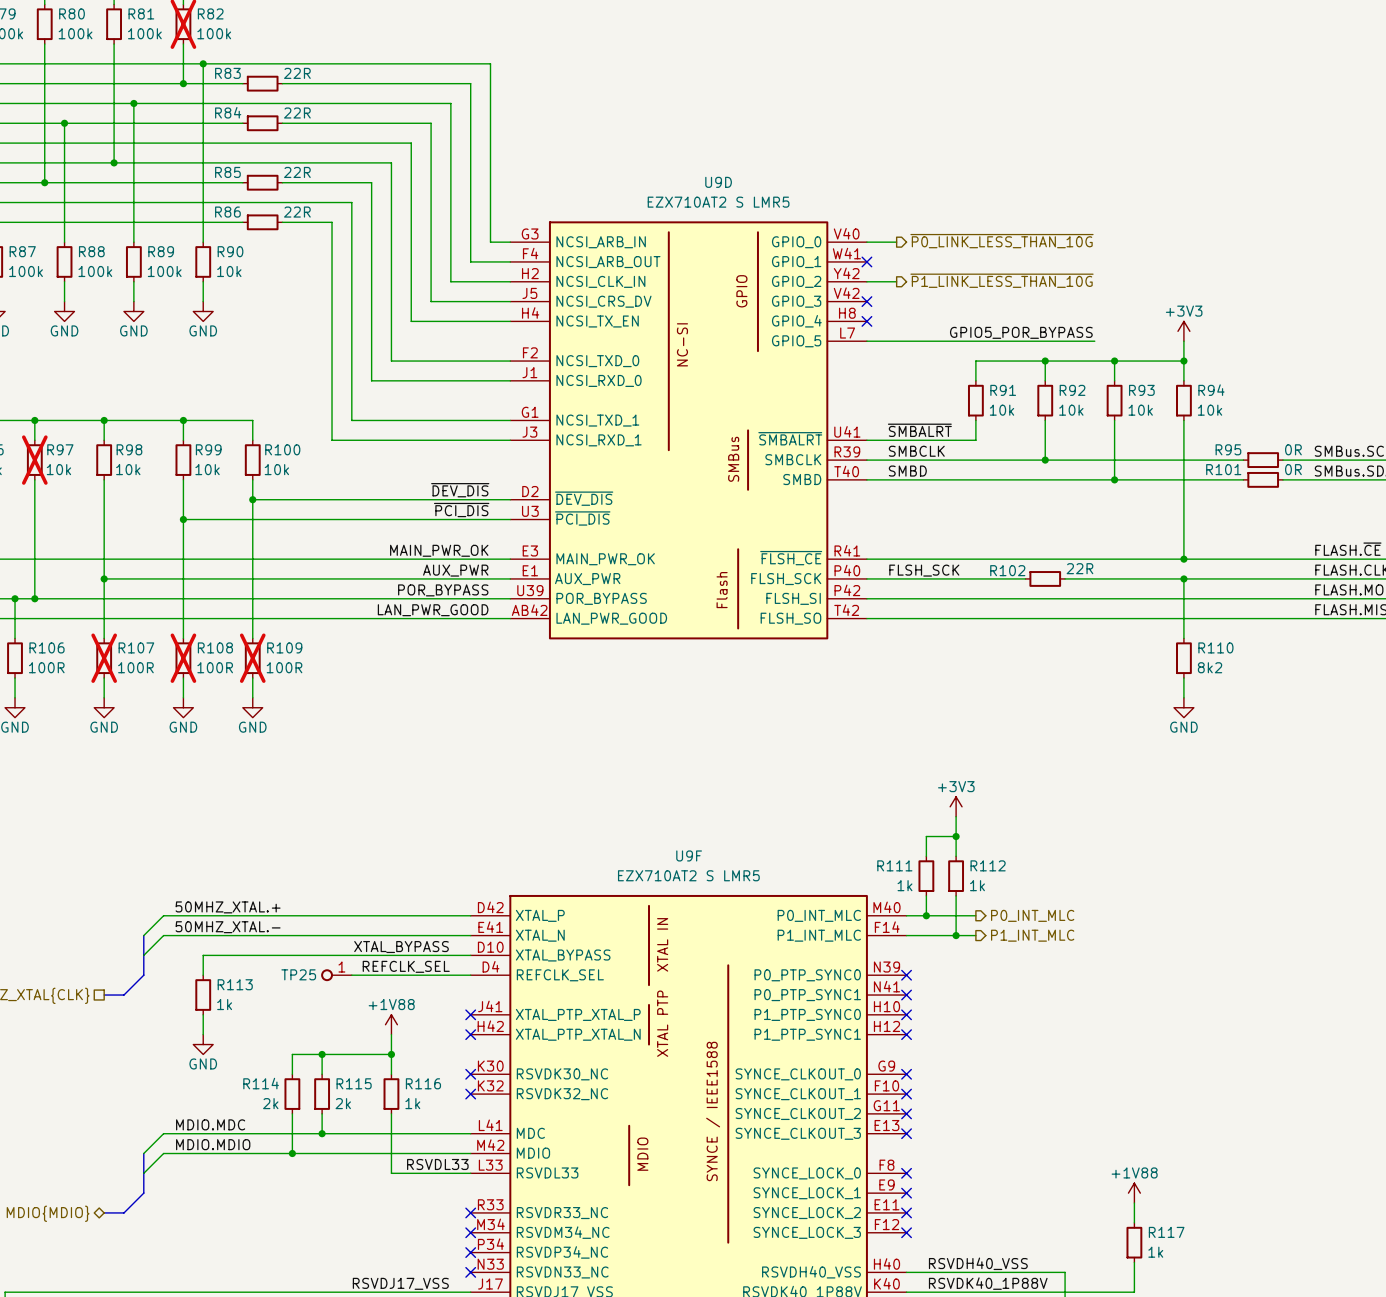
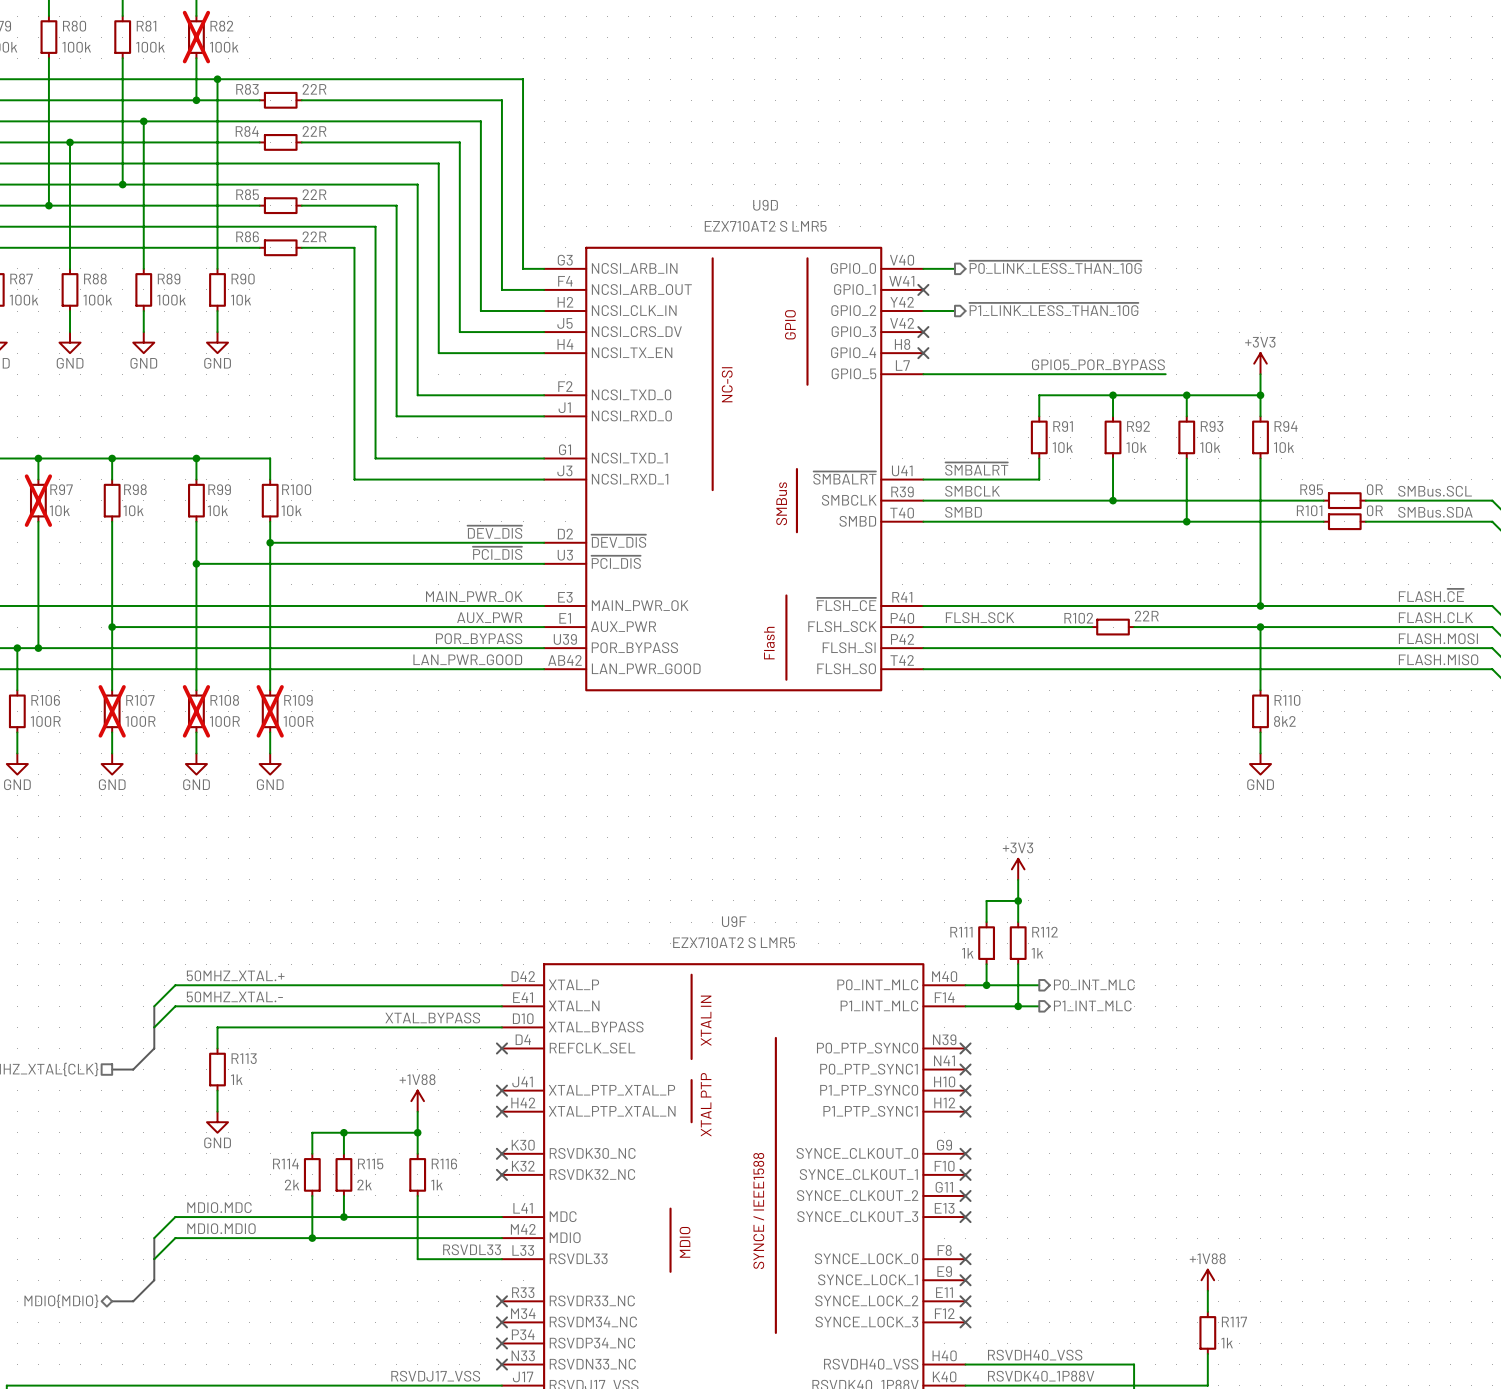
label: REFCLK_SEL (406, 966) -> none
TP25: (336, 975) -> none
wire: (351, 975) (470, 975) -> none
no-connect mark: none -> (501, 1048)

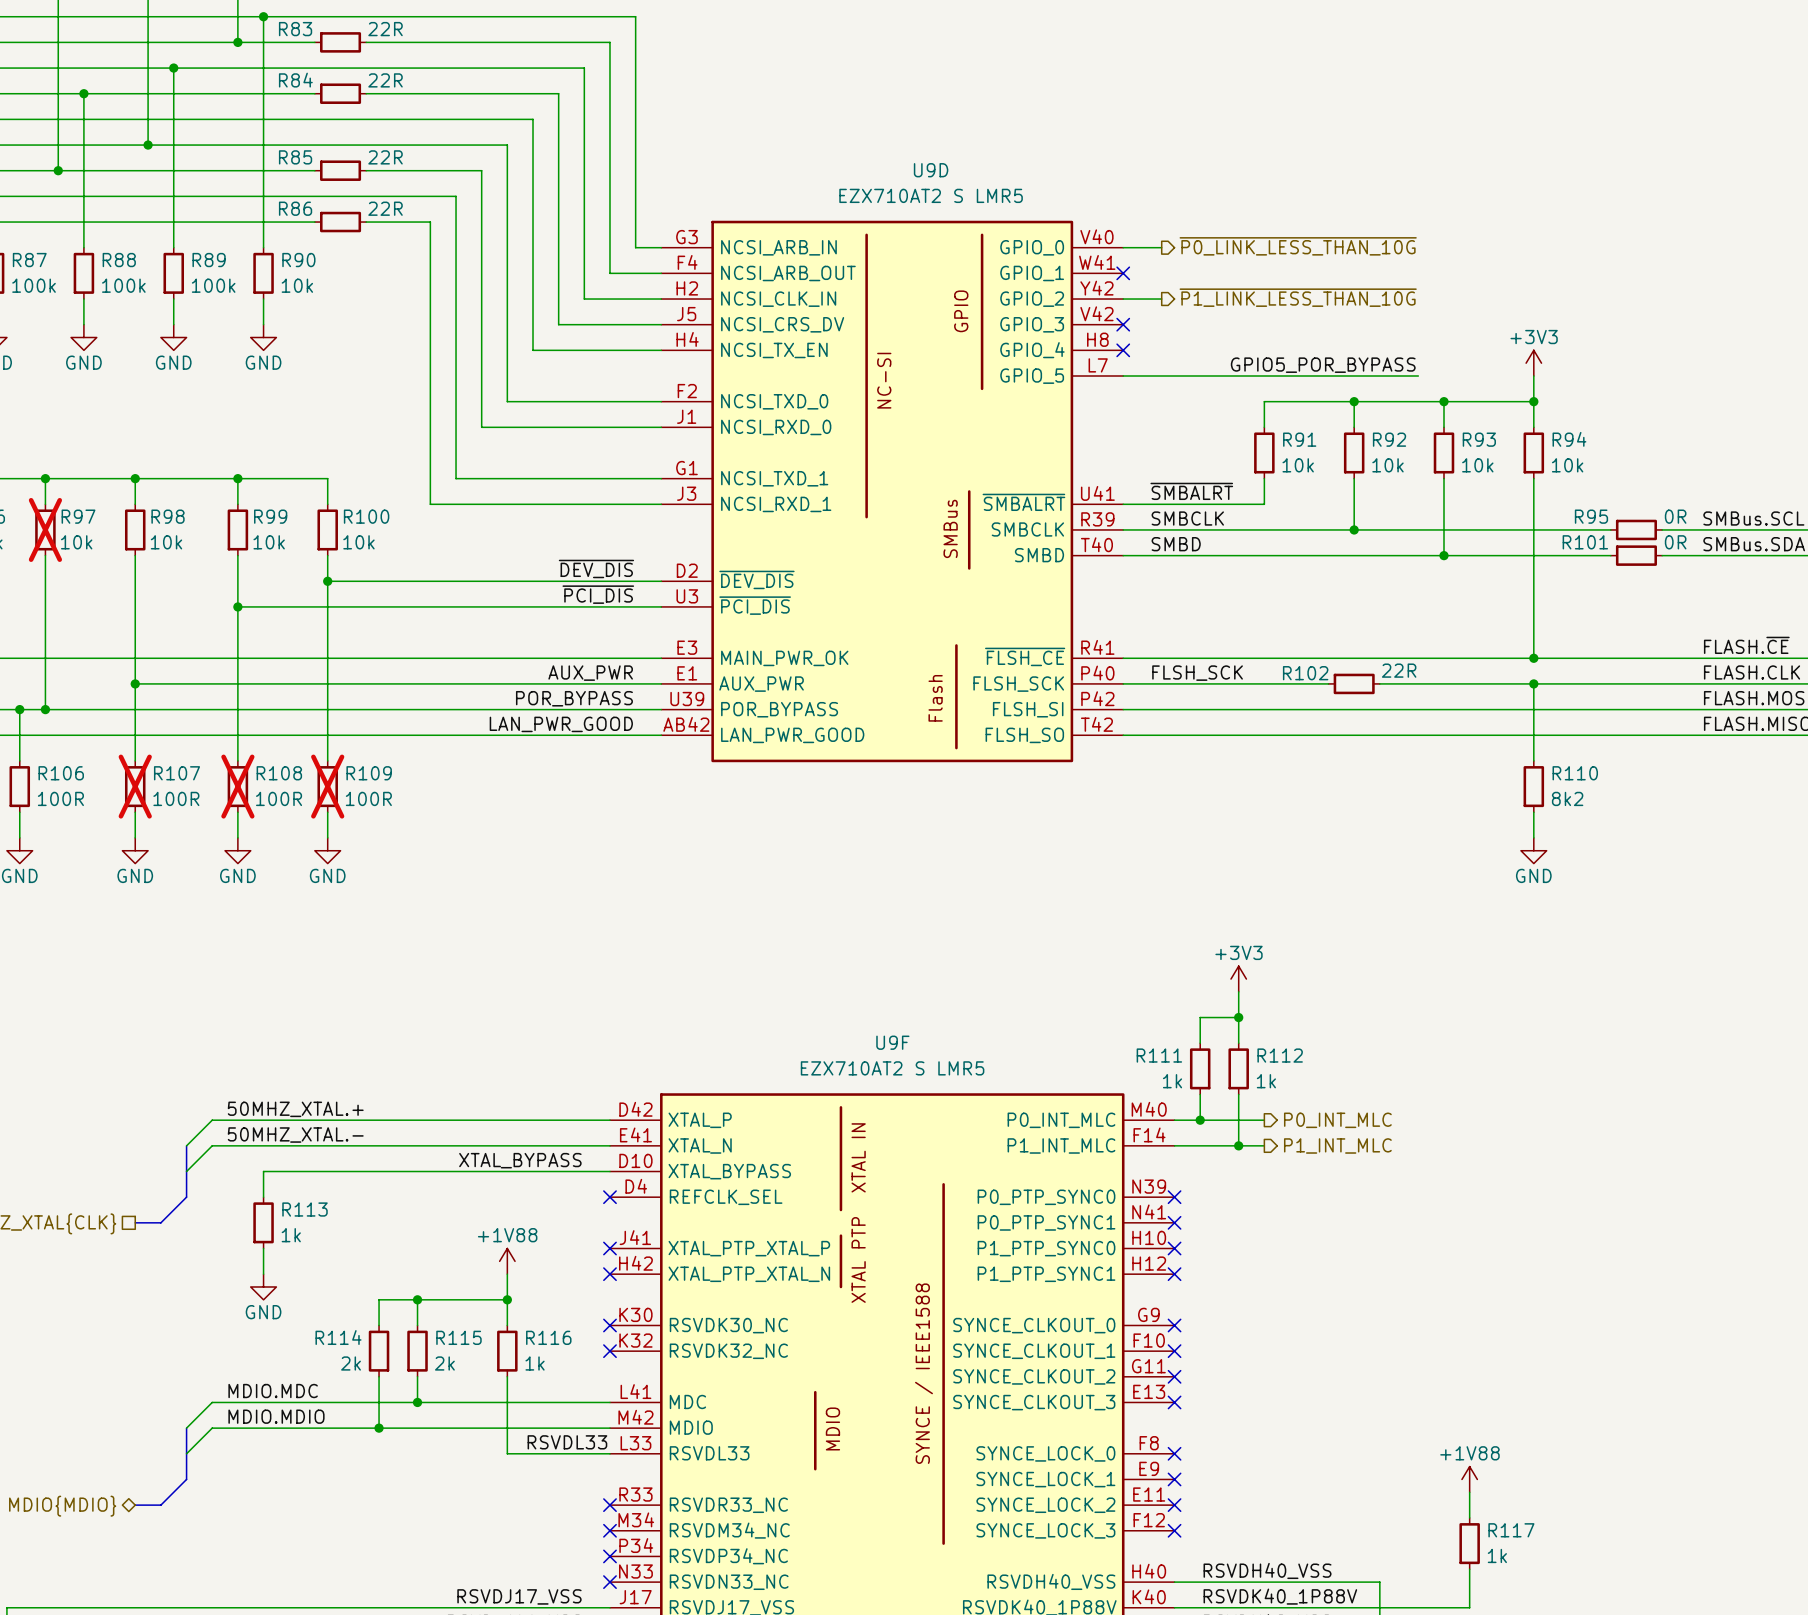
label: MAIN_PWR_OK (474, 596) -> none

